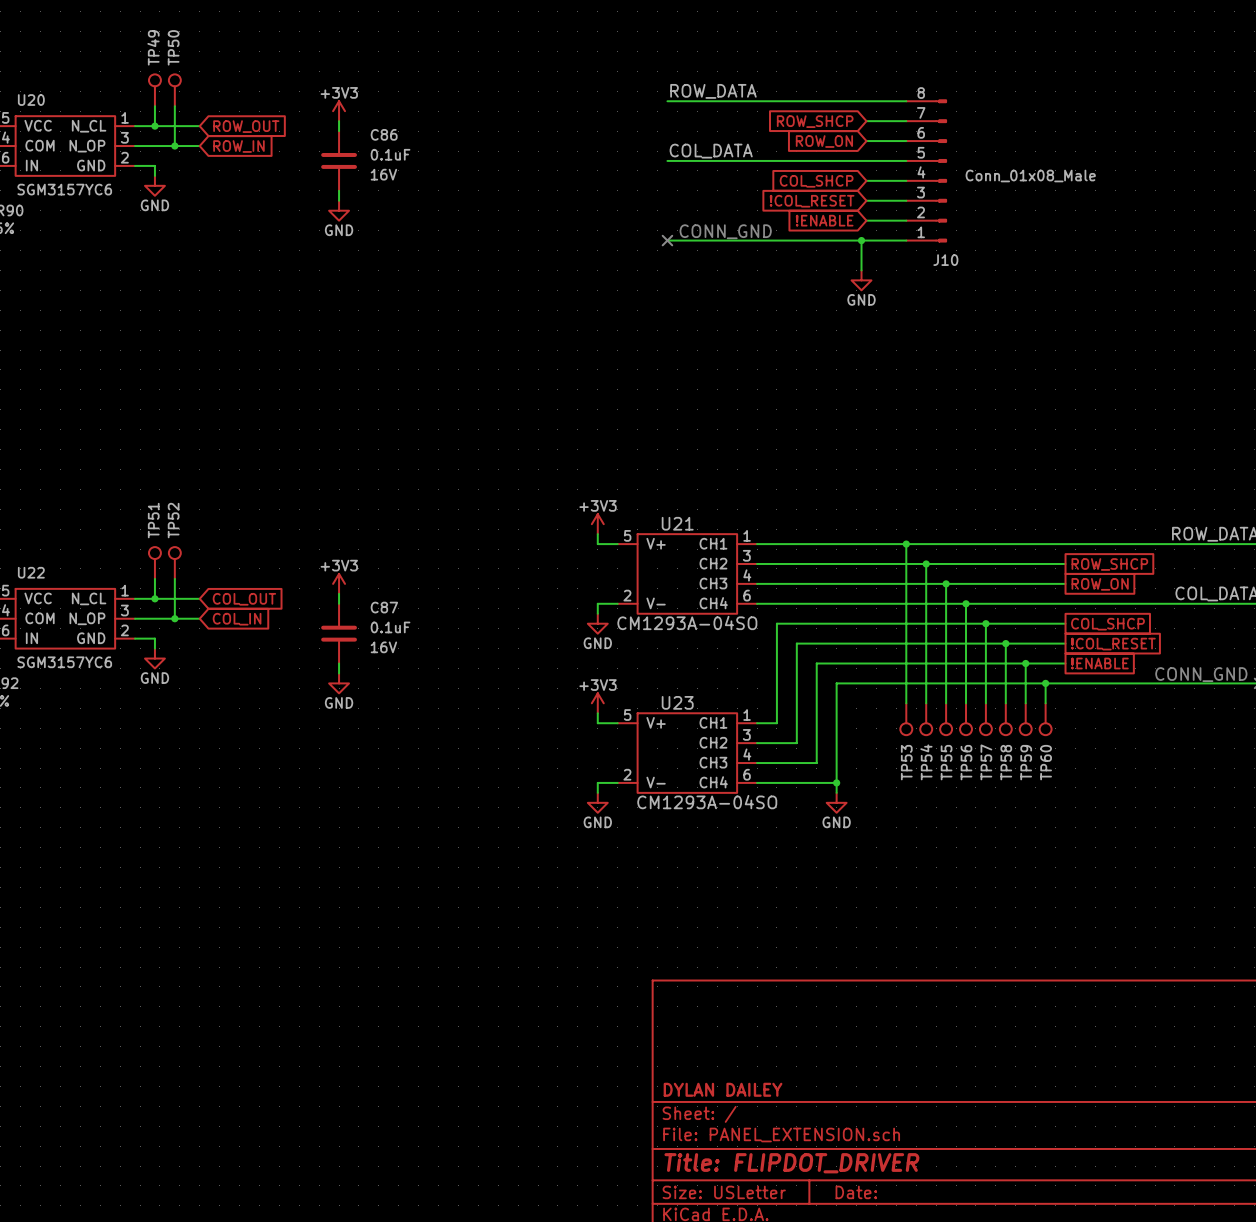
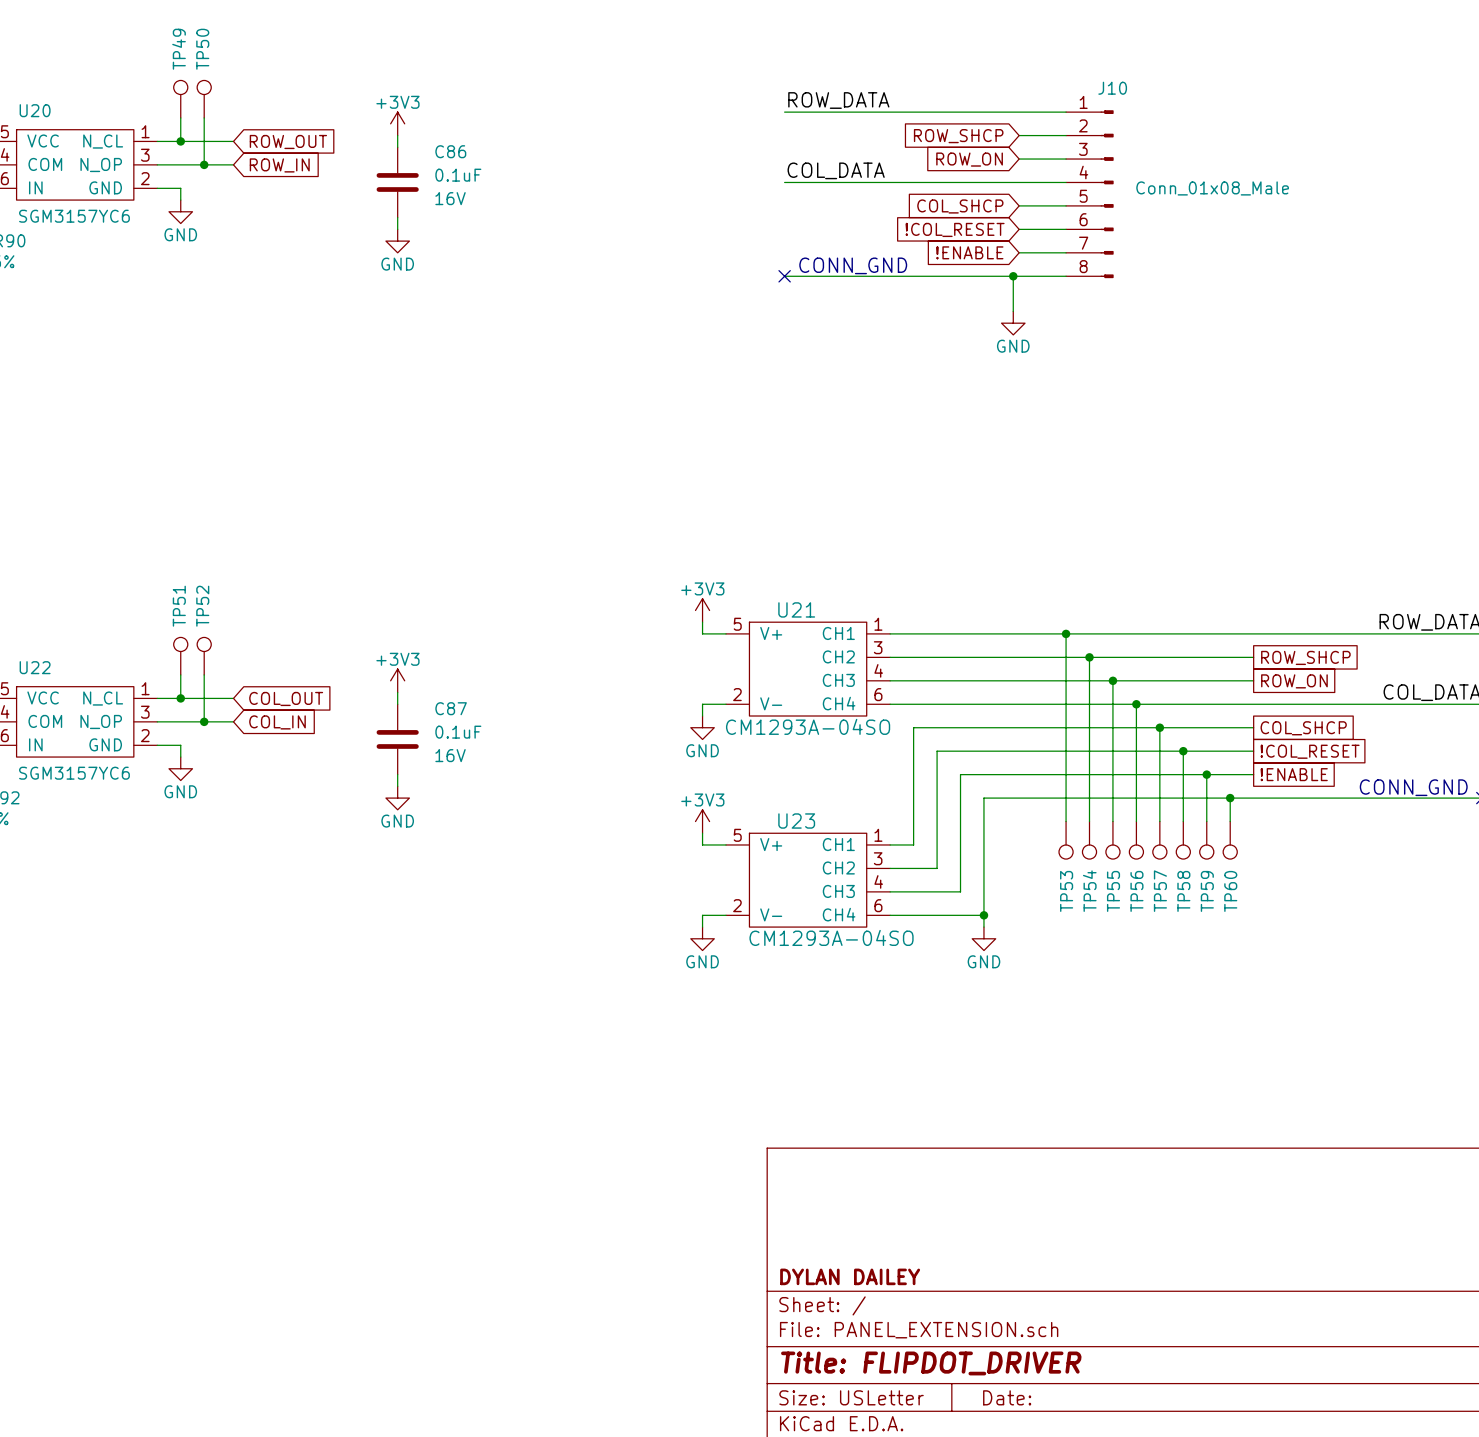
J10 flip: as is (941, 170) -> up-down (1107, 194)

